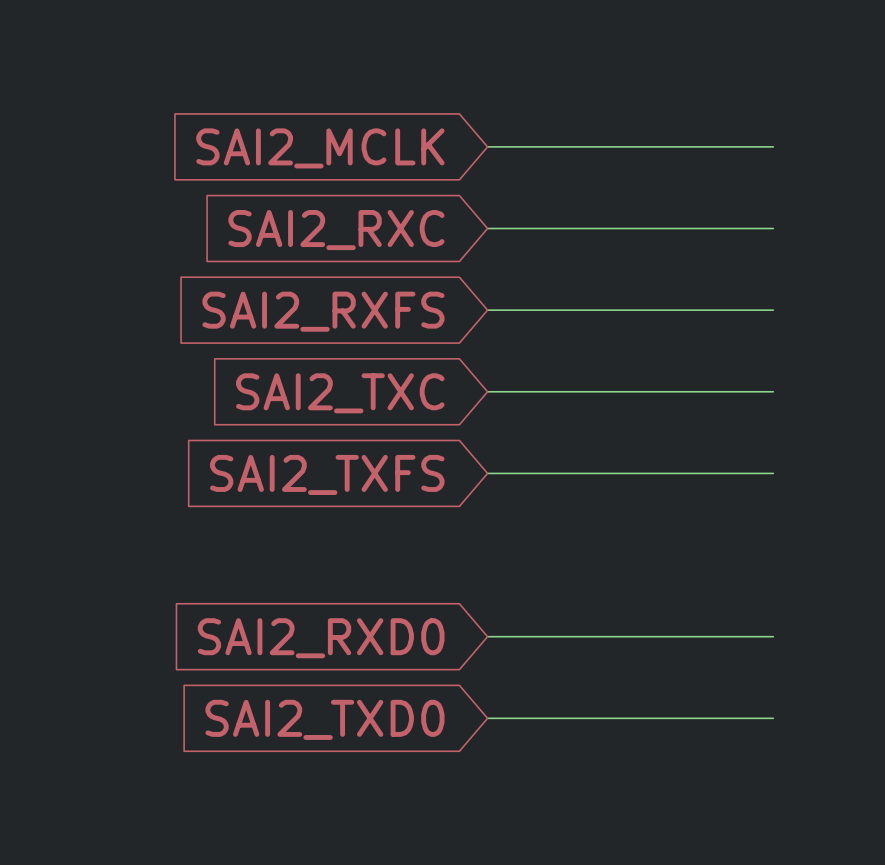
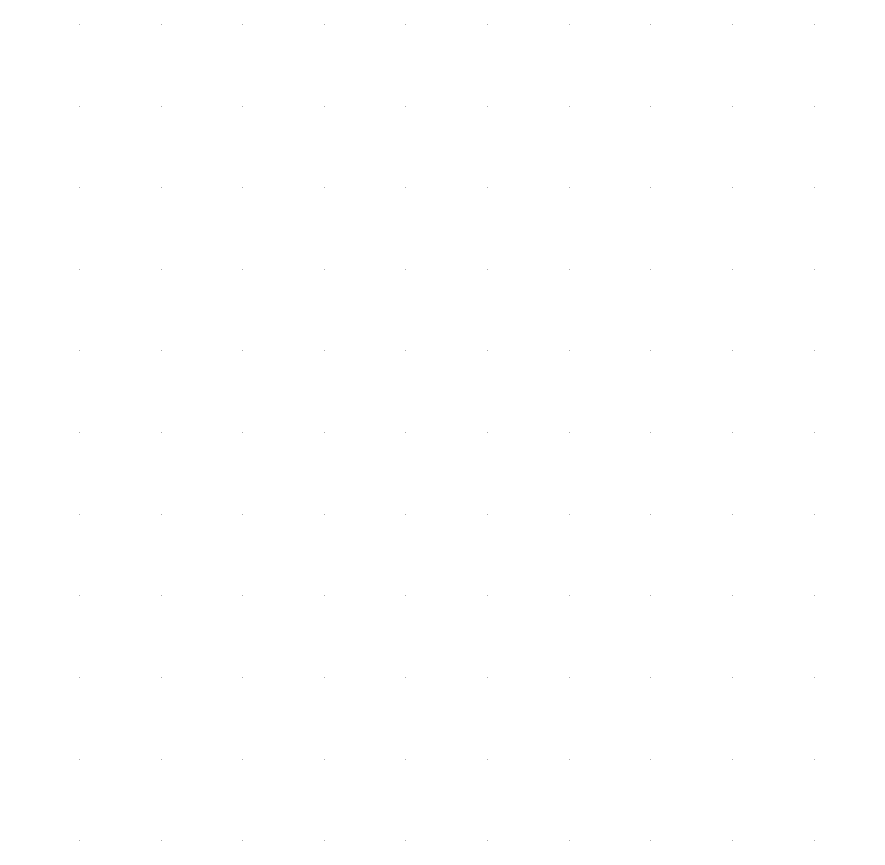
wire: (487, 146) (773, 146) -> none
global label: SAI2_MCLK (320, 148) -> none
wire: (487, 228) (773, 228) -> none
global label: SAI2_RXC (336, 230) -> none
wire: (487, 310) (773, 310) -> none
global label: SAI2_RXFS (323, 311) -> none
wire: (487, 391) (773, 391) -> none
global label: SAI2_TXC (340, 393) -> none
wire: (487, 473) (773, 473) -> none
global label: SAI2_TXFS (327, 474) -> none
wire: (487, 636) (773, 636) -> none
global label: SAI2_RXD0 (321, 638) -> none
wire: (487, 718) (773, 718) -> none
global label: SAI2_TXD0 (324, 719) -> none

